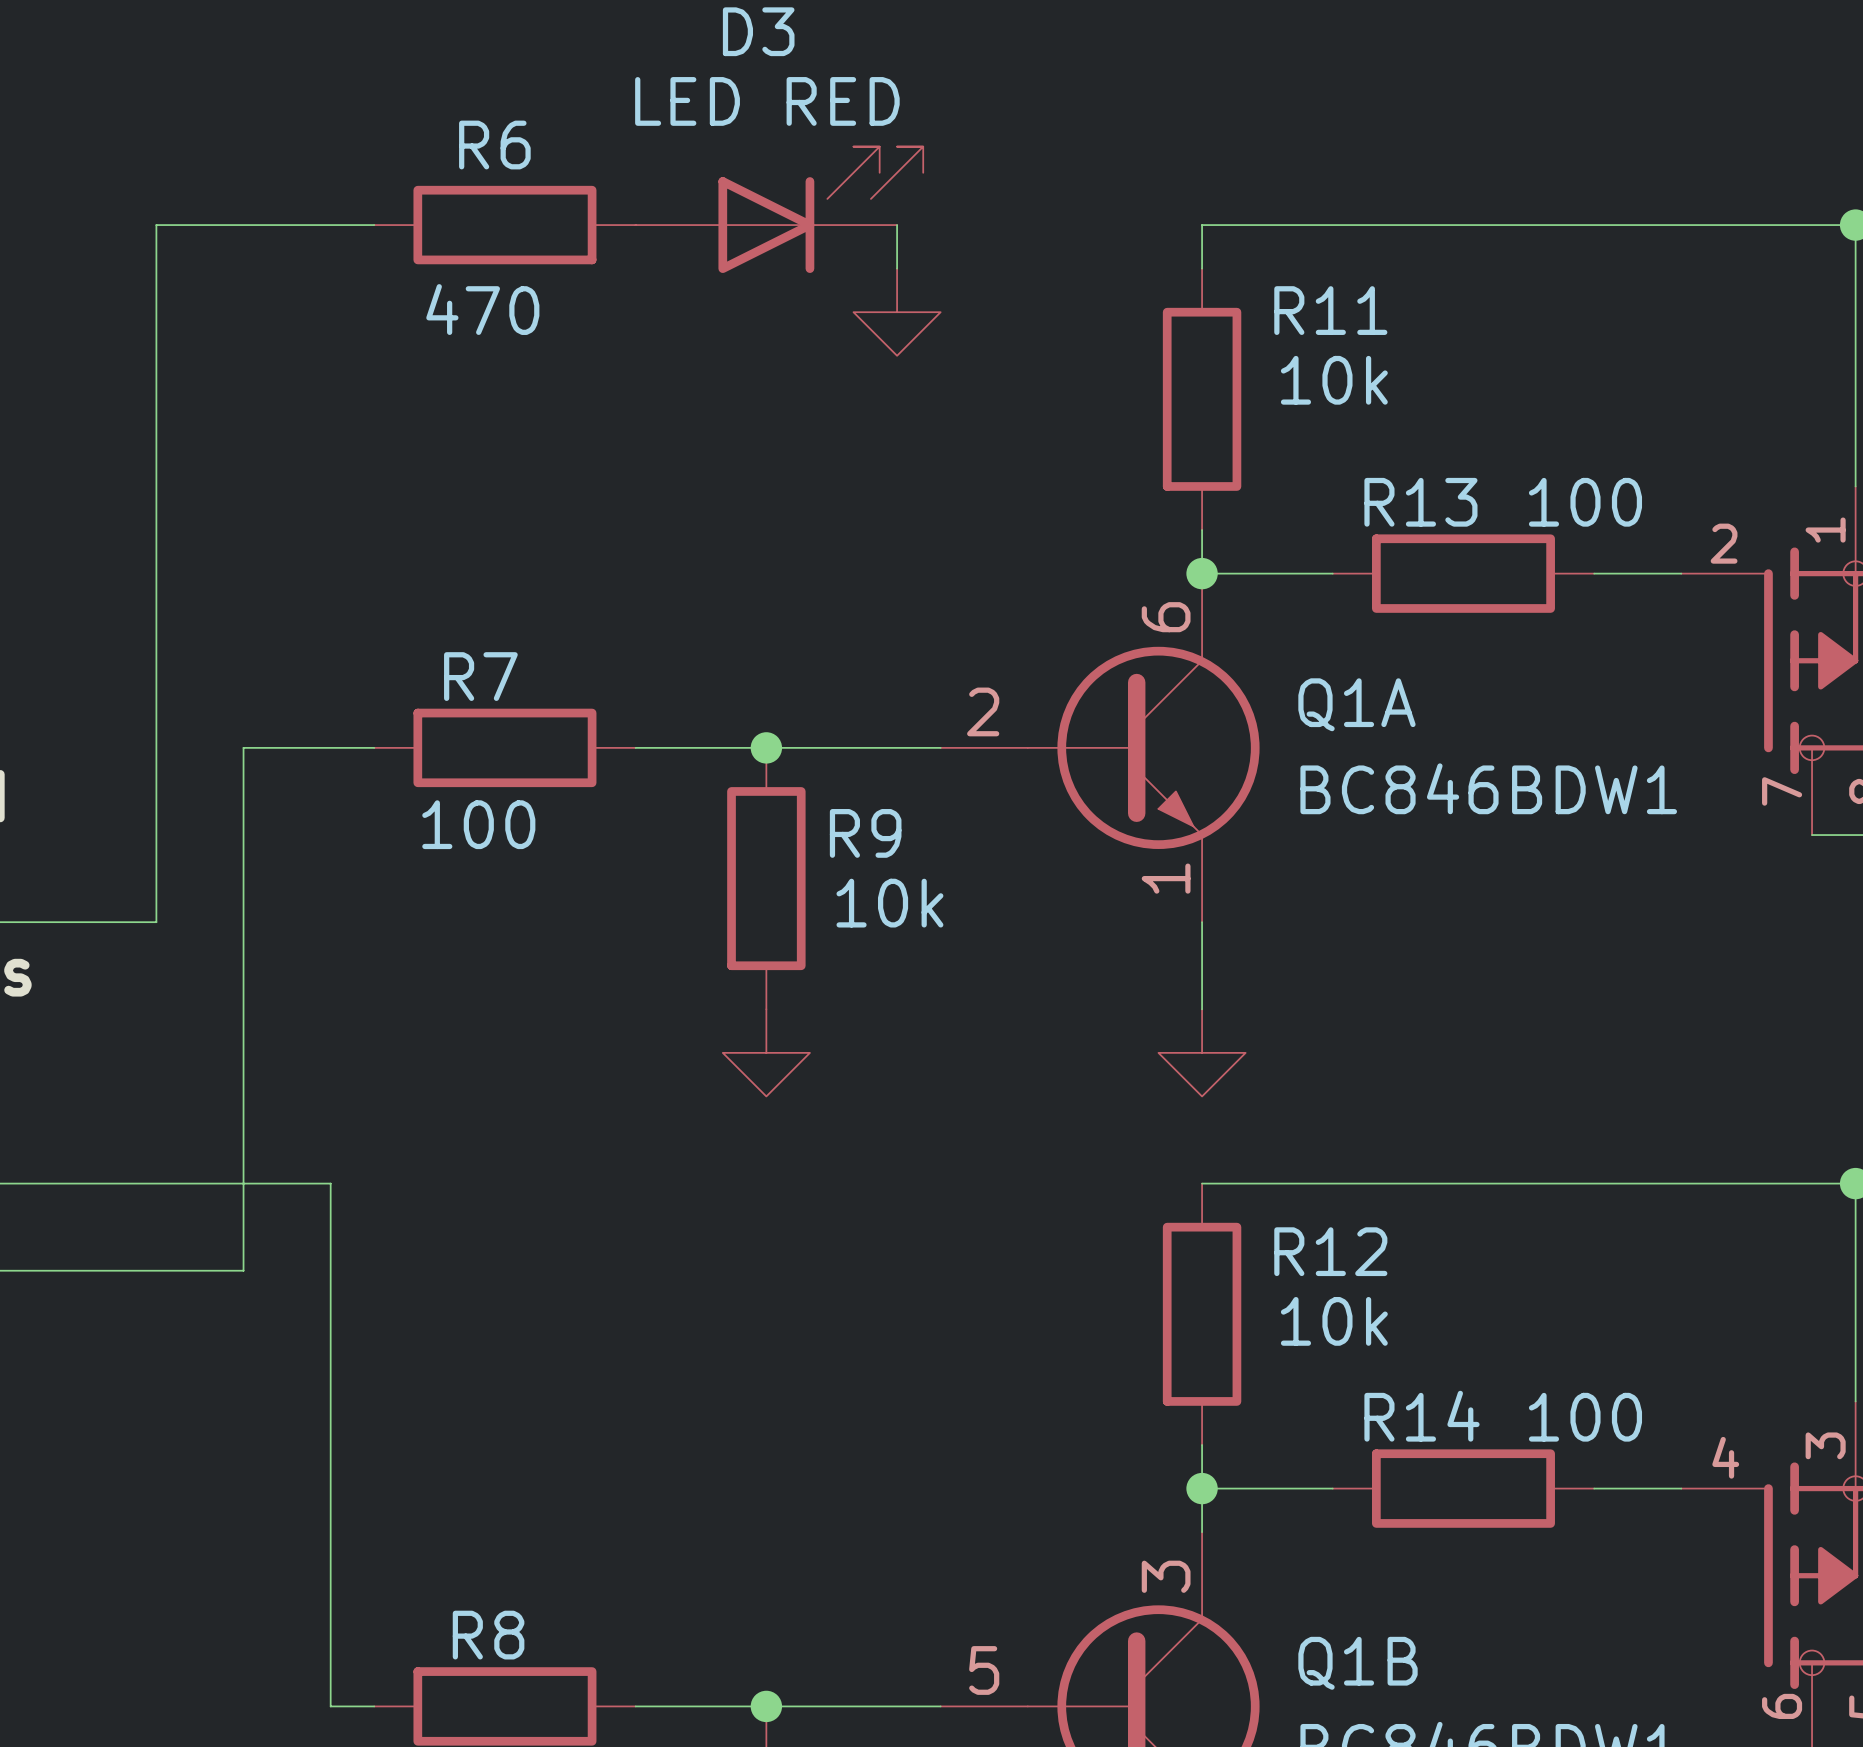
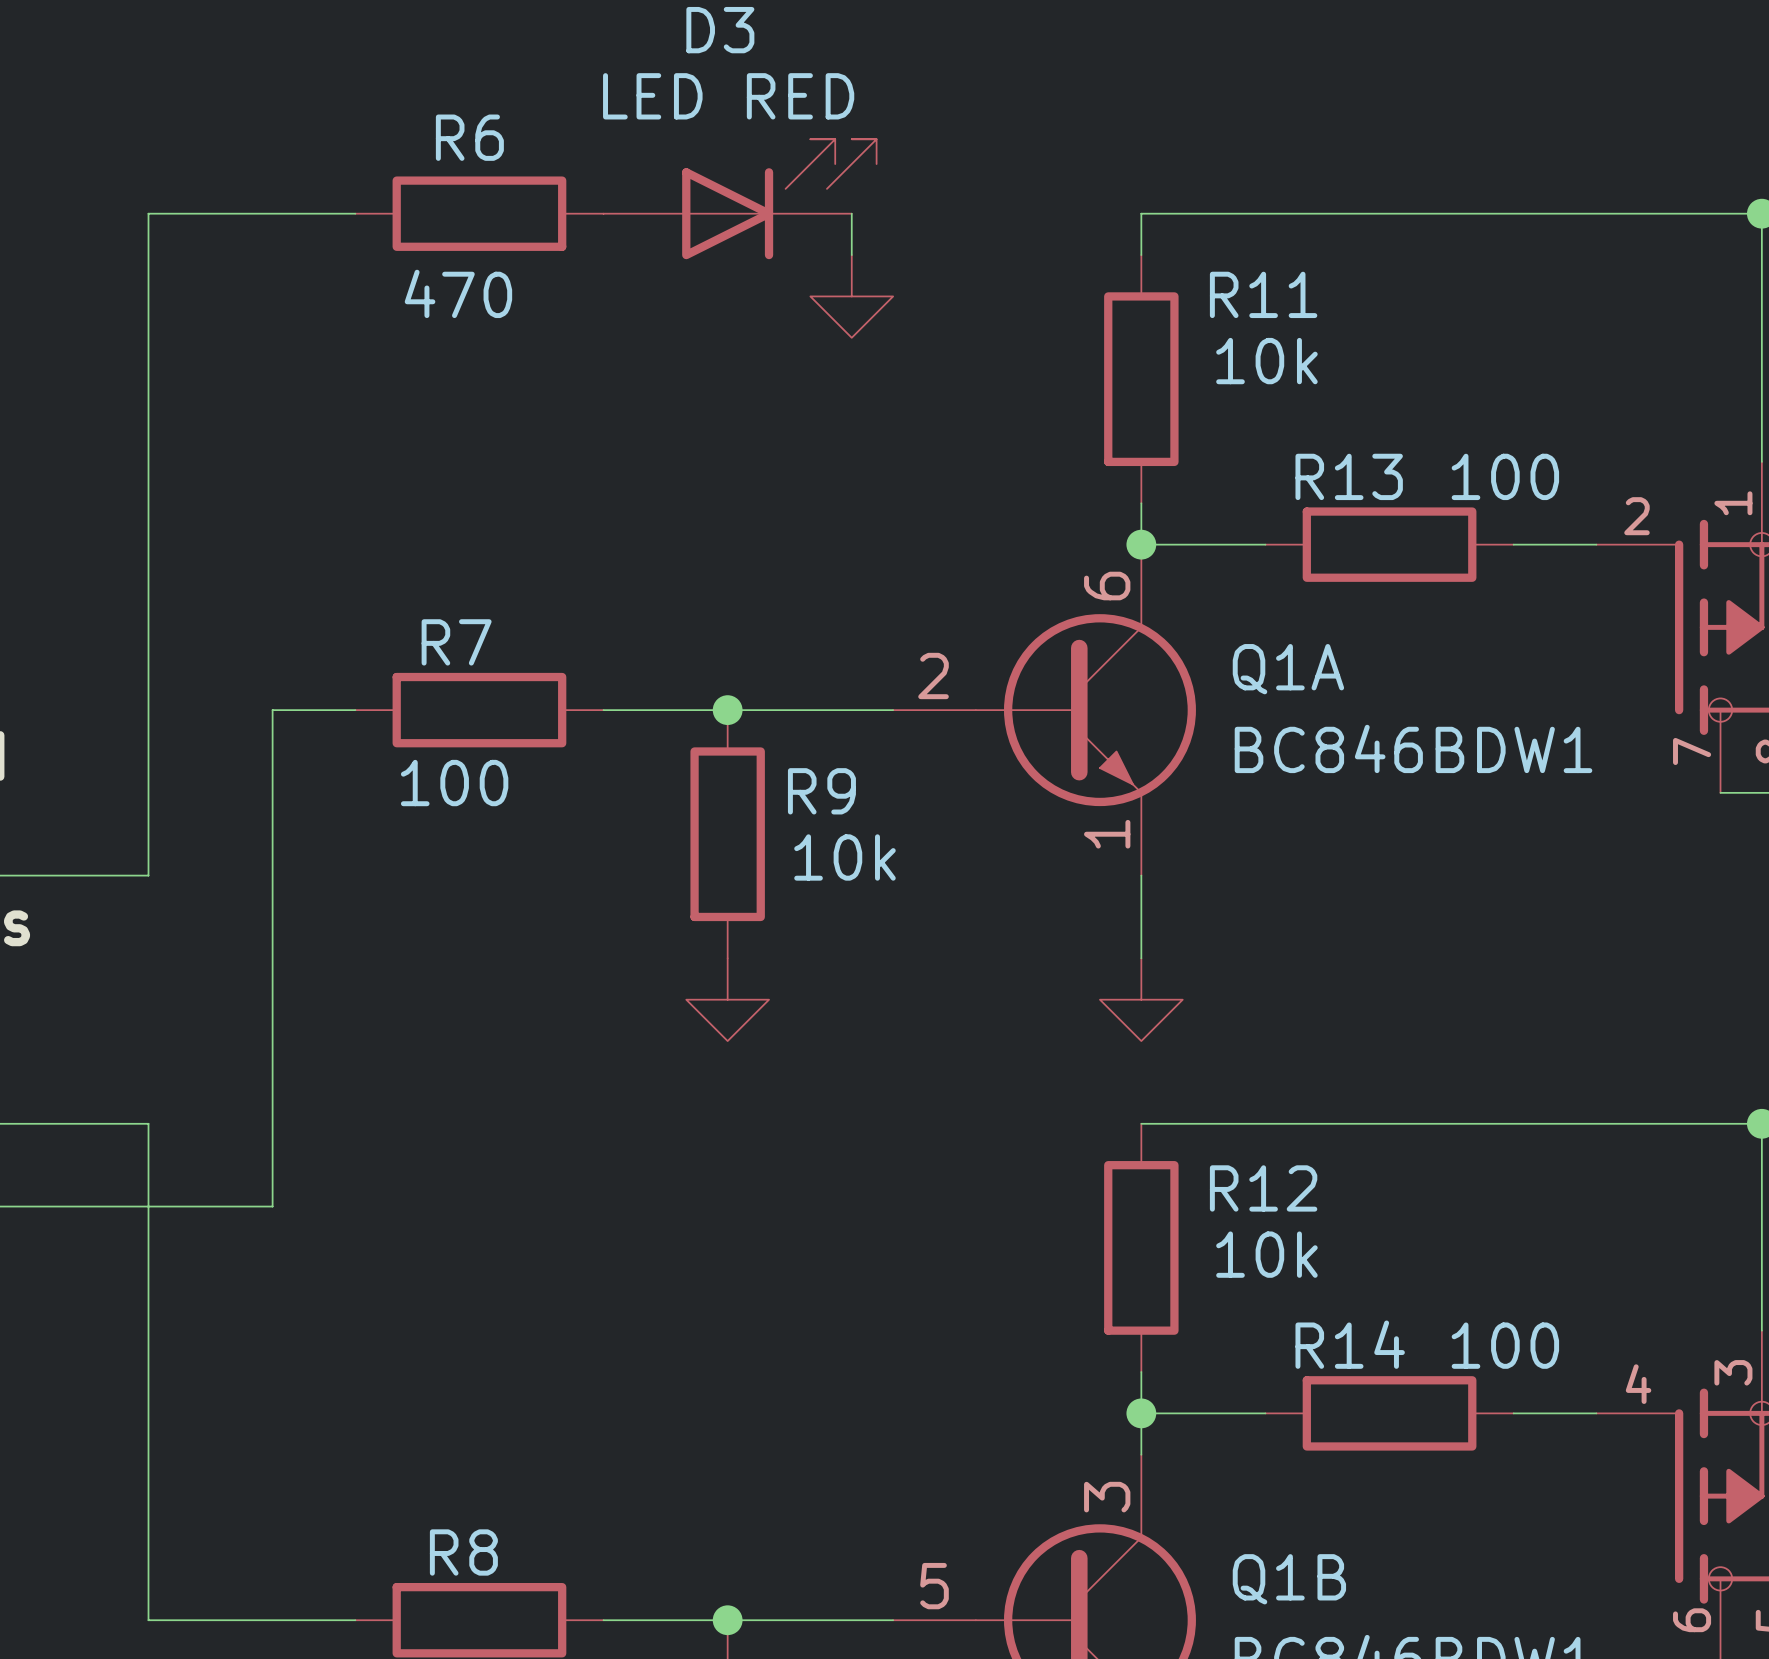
wire: (287, 747) (243, 747) (243, 1270) -> (272, 710) (272, 1206) (231, 1206)
wire: (156, 1183) (330, 1183) (330, 1706) -> (148, 1123) (148, 1620) (313, 1620)

